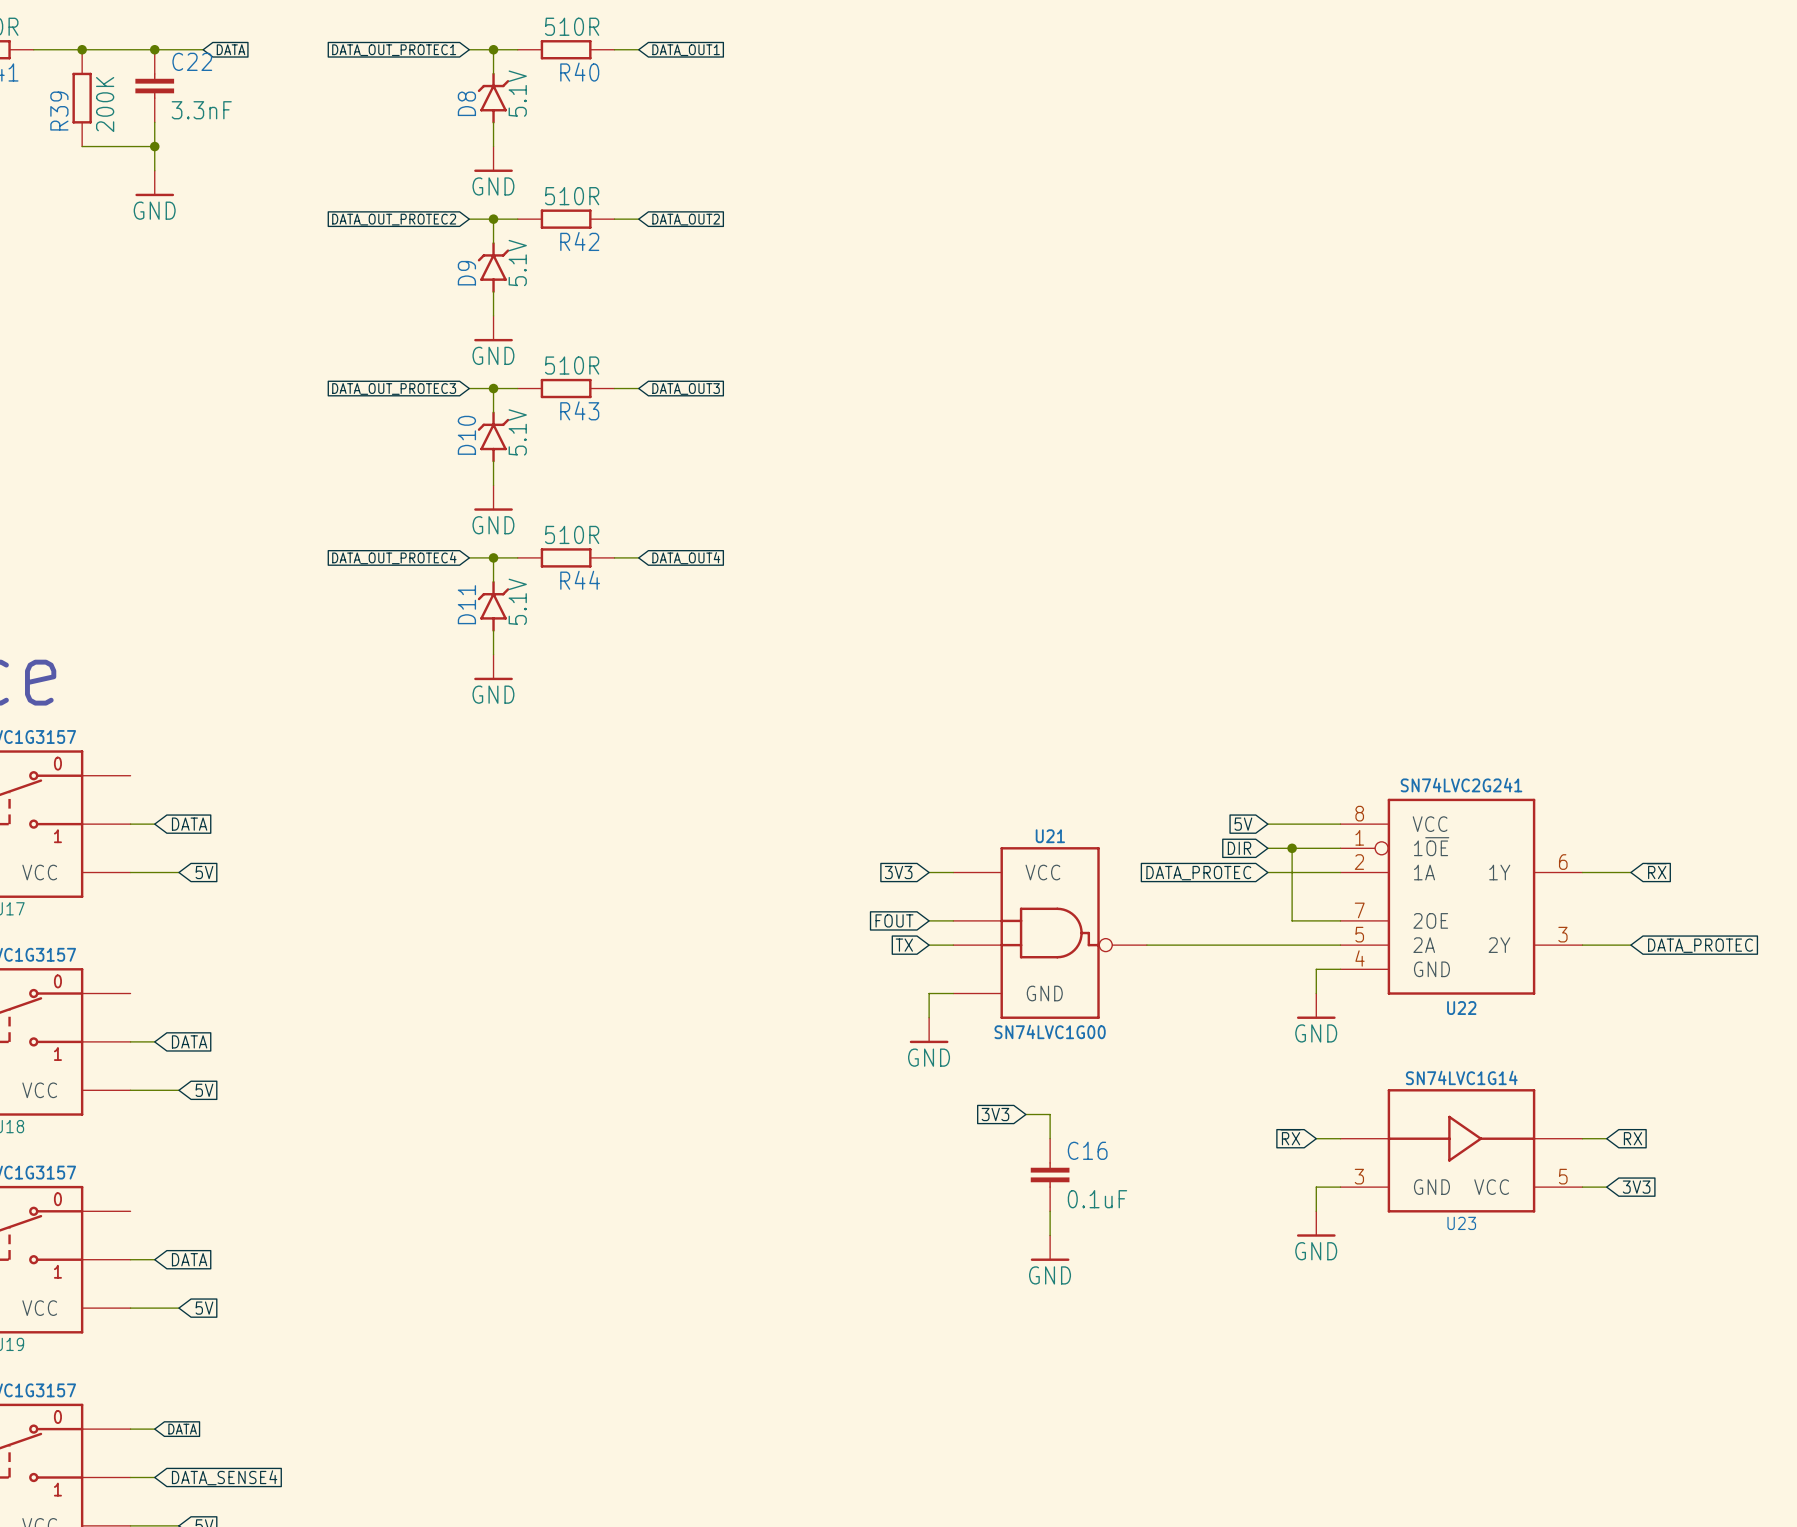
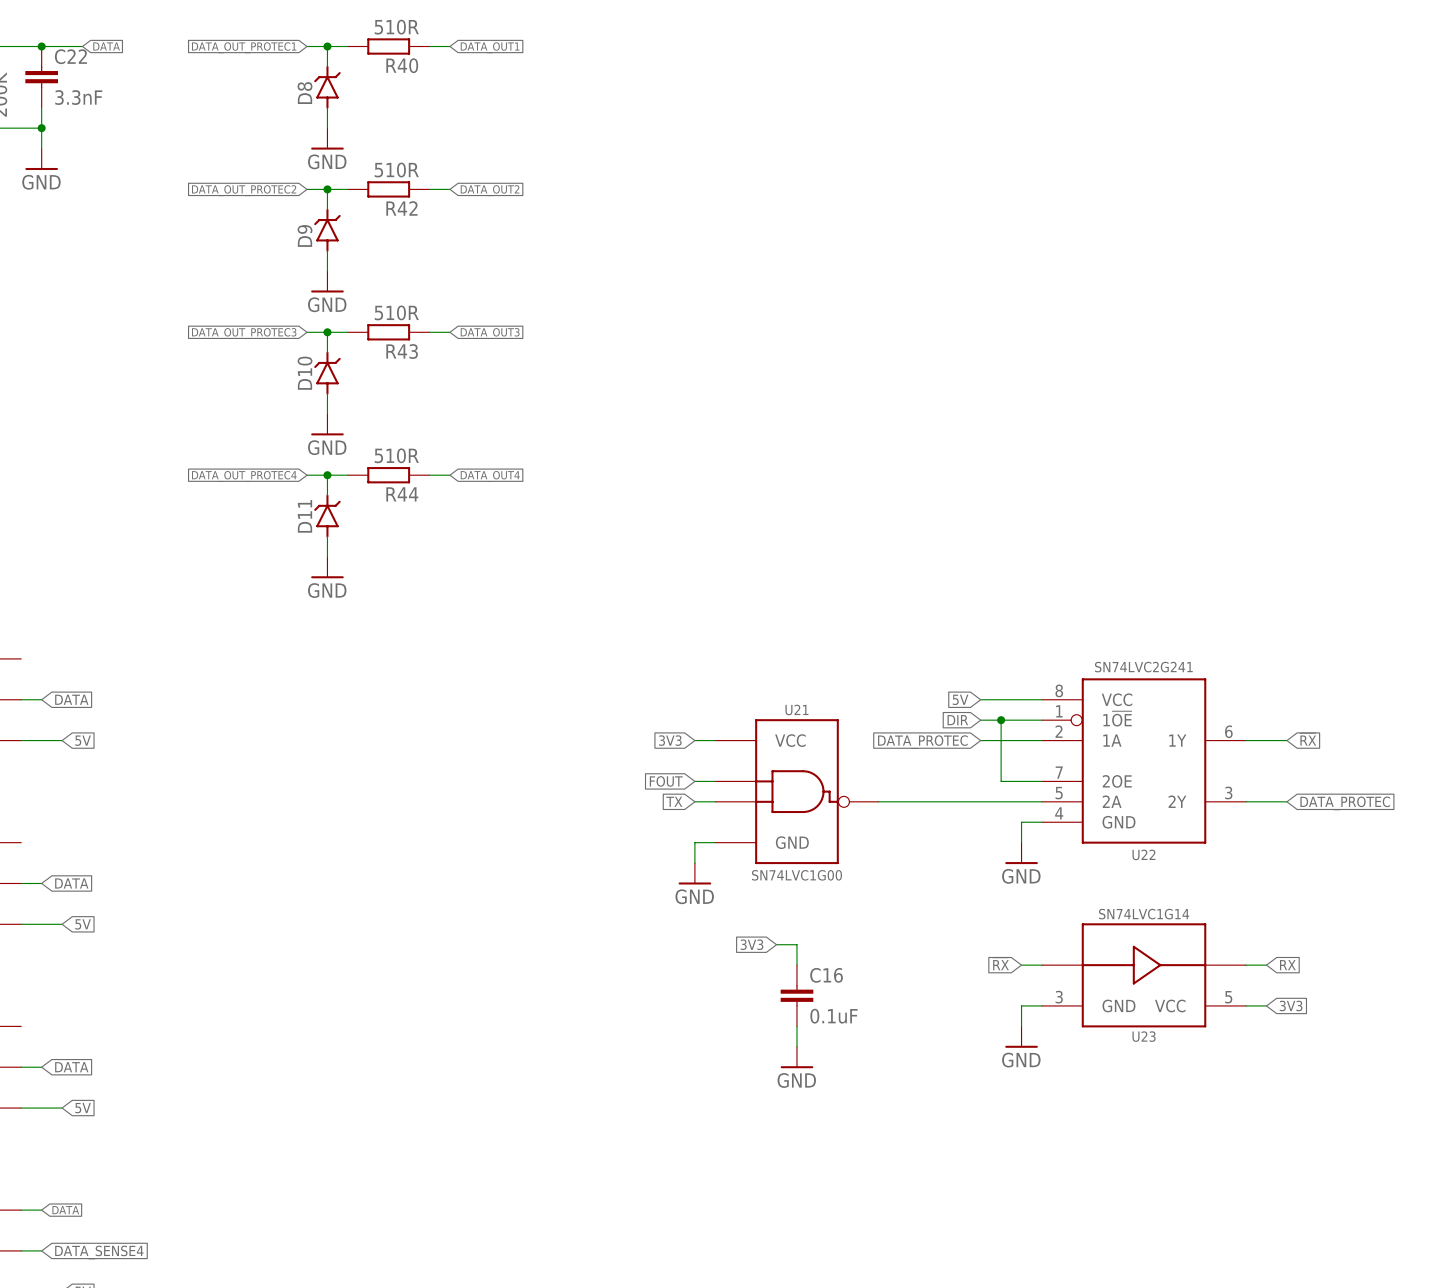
D8 value: 5.1V (517, 93) -> none
D9 value: 5.1V (517, 263) -> none
D10 value: 5.1V (517, 432) -> none
D11 value: 5.1V (517, 601) -> none

